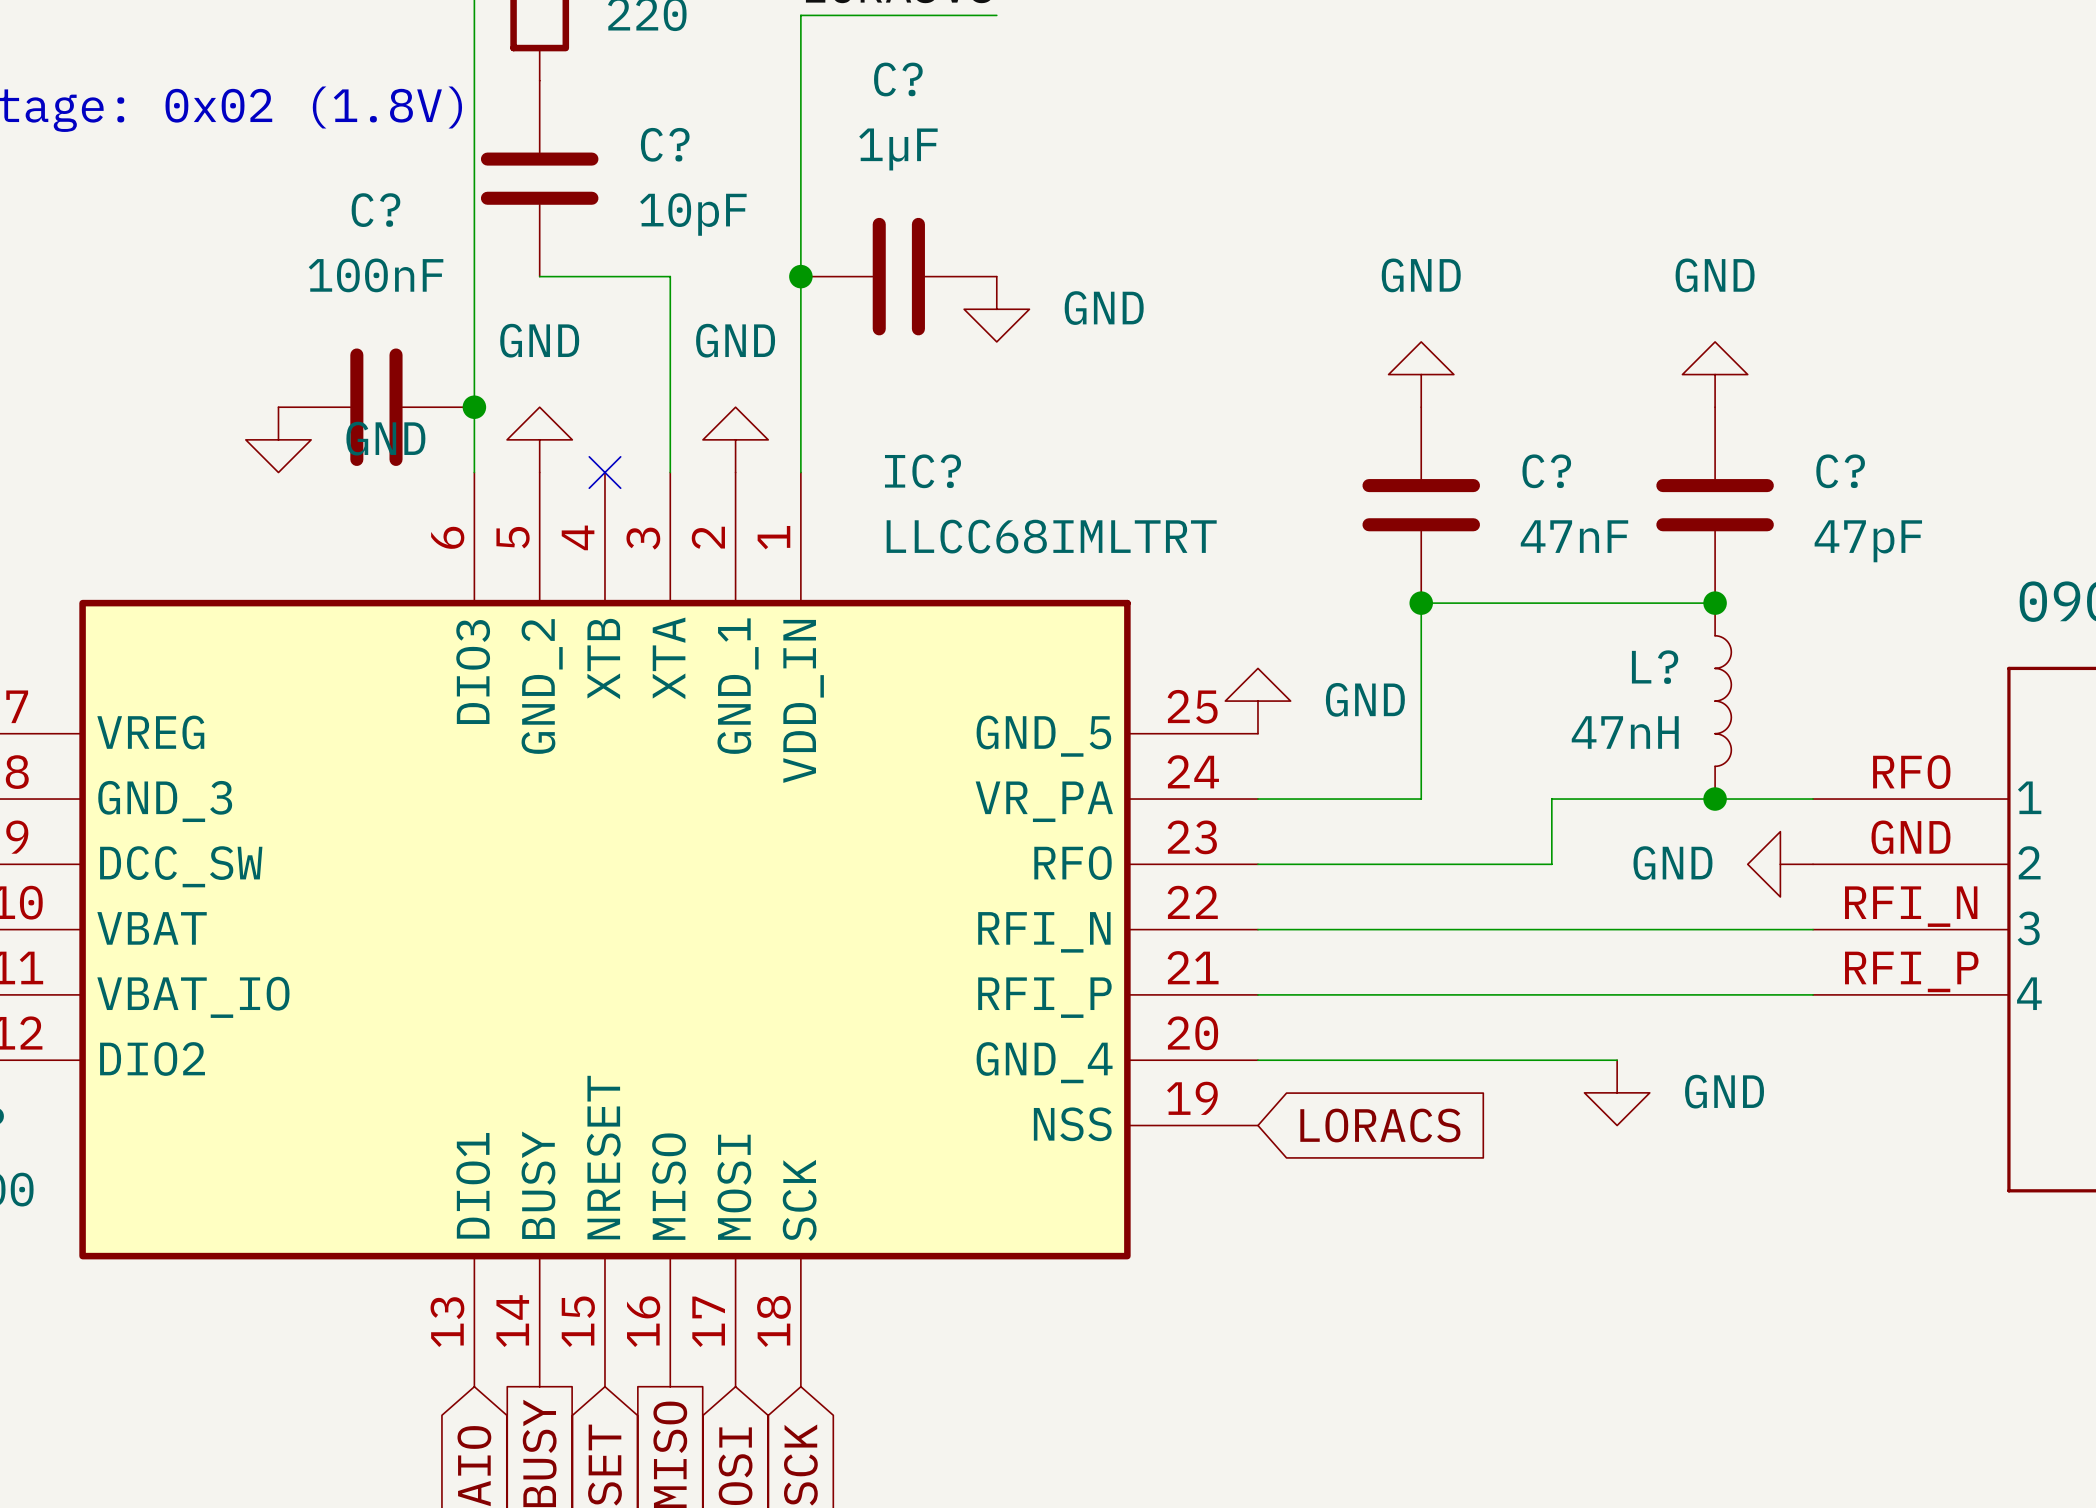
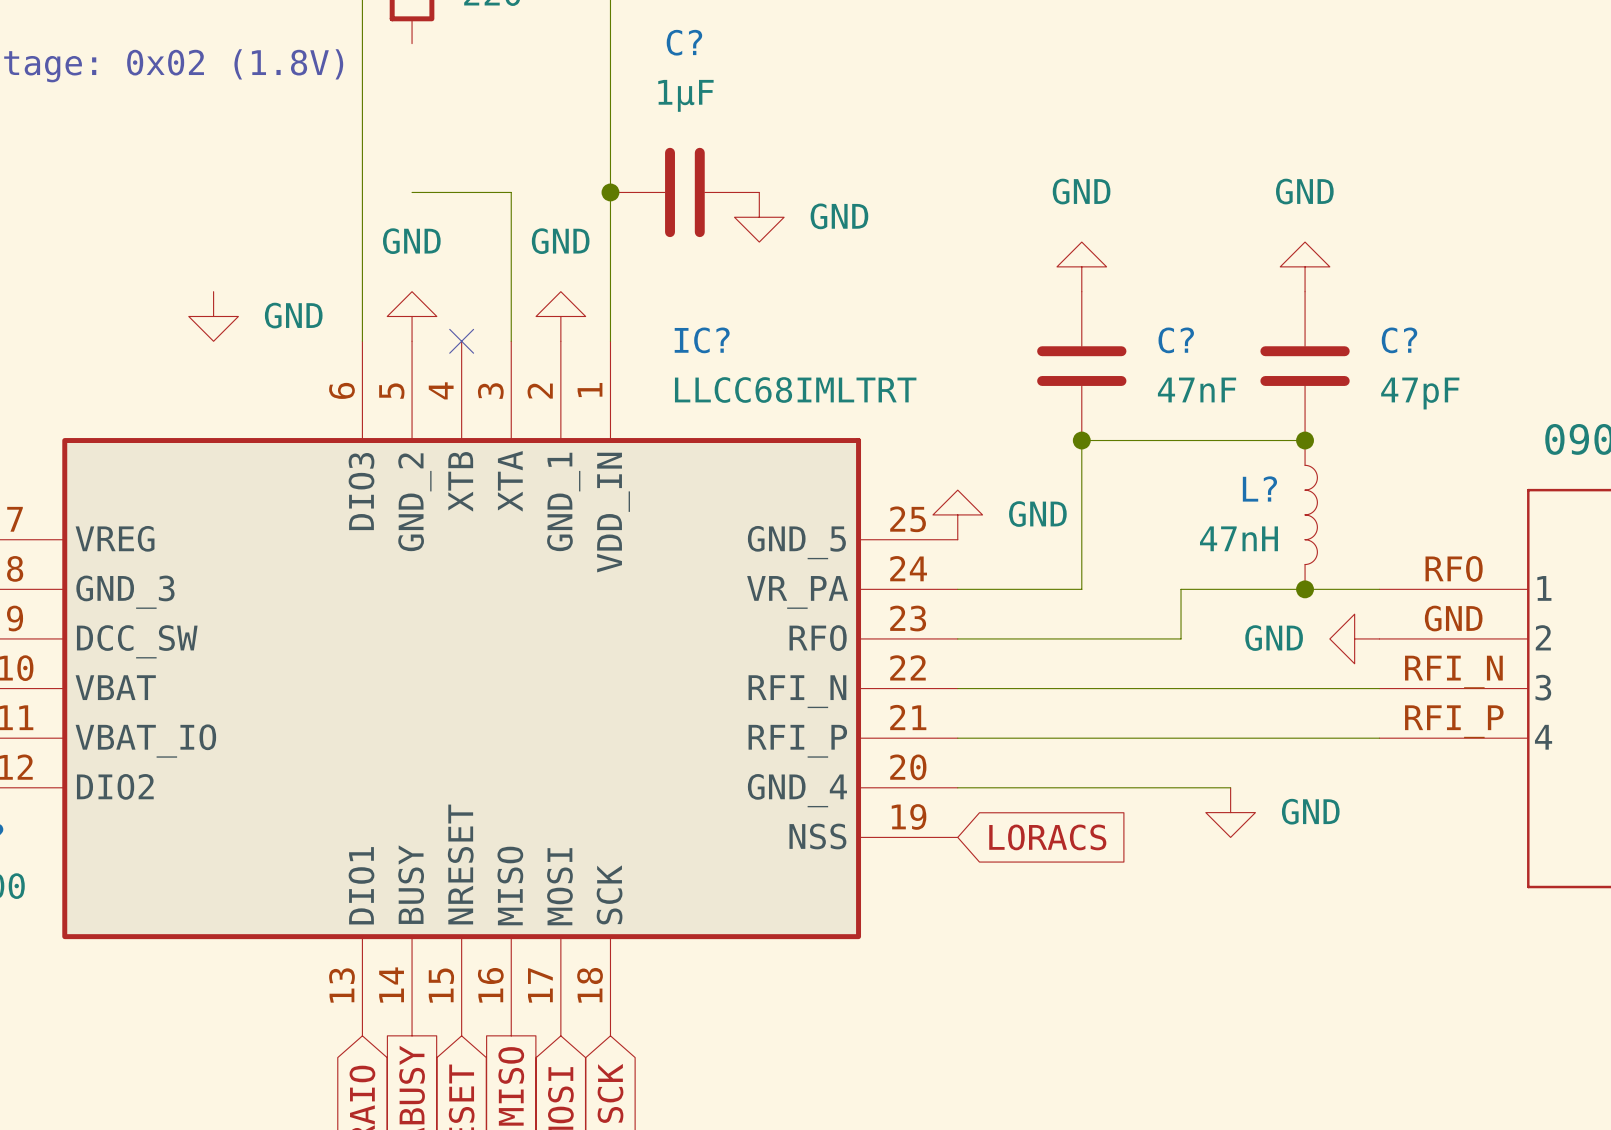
C?: 10pF (539, 178) -> none
C?: 100nF (376, 407) -> none
junction: (474, 407) -> none

